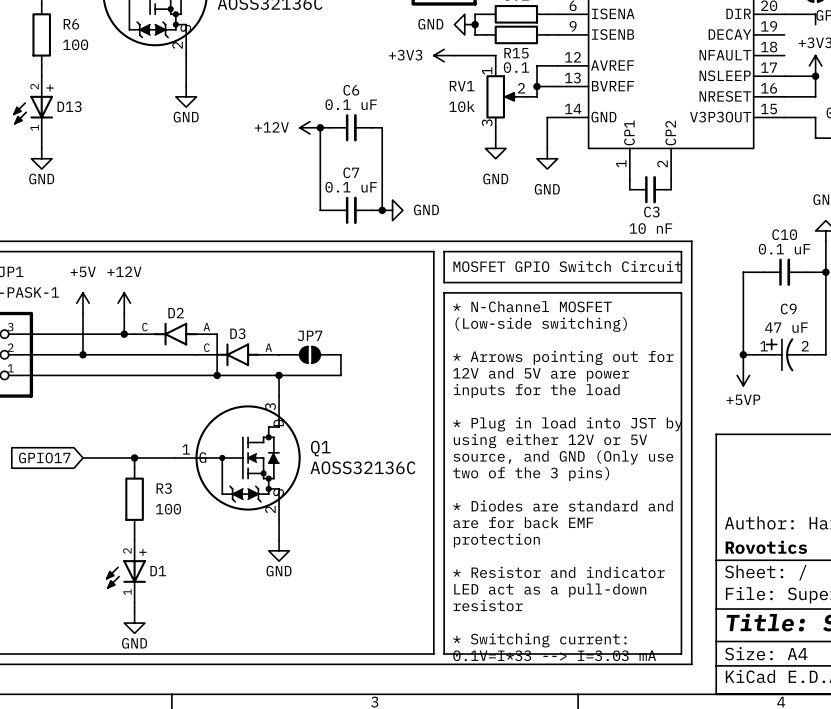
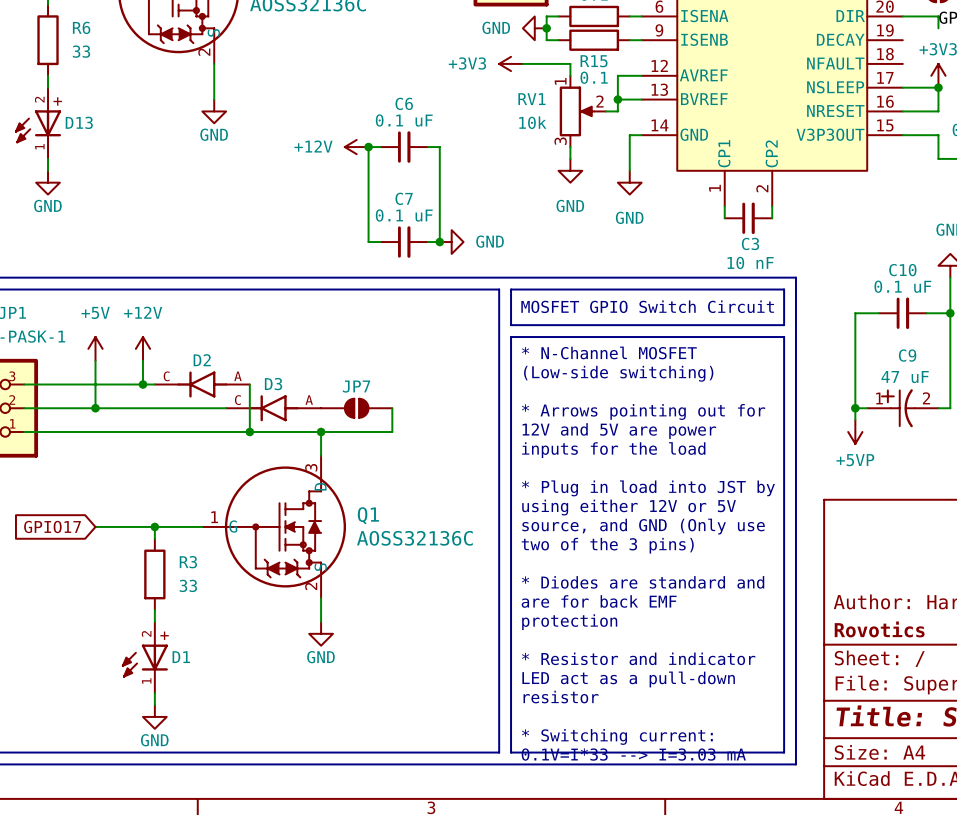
R6 value: 100 (75, 44) -> 33 (81, 51)
R3 value: 100 (168, 509) -> 33 (188, 585)

